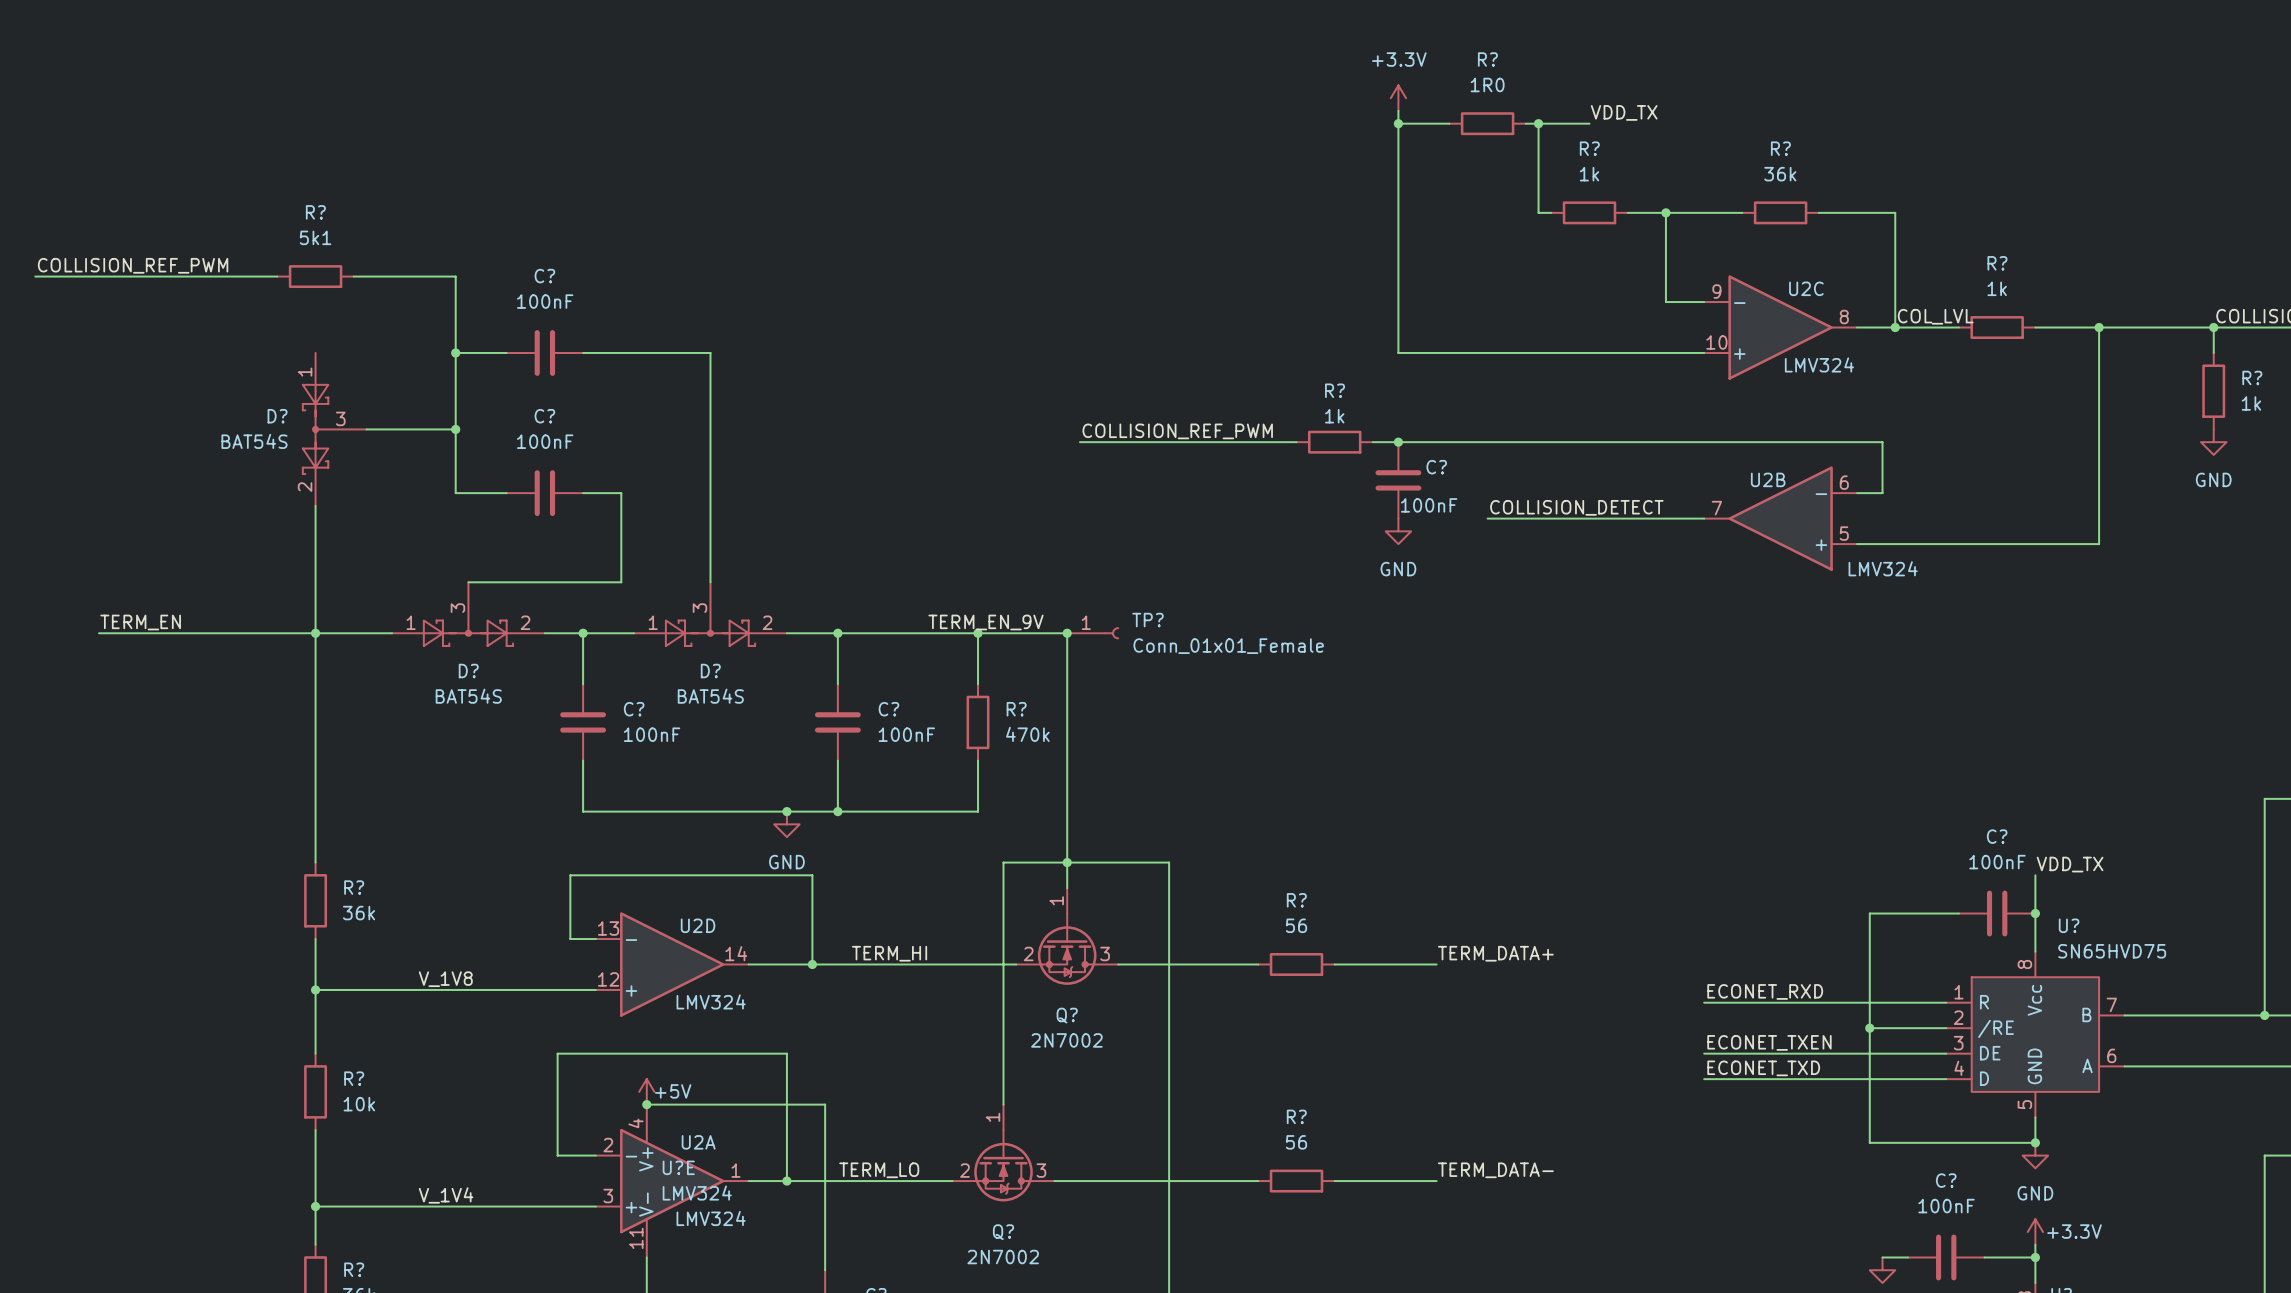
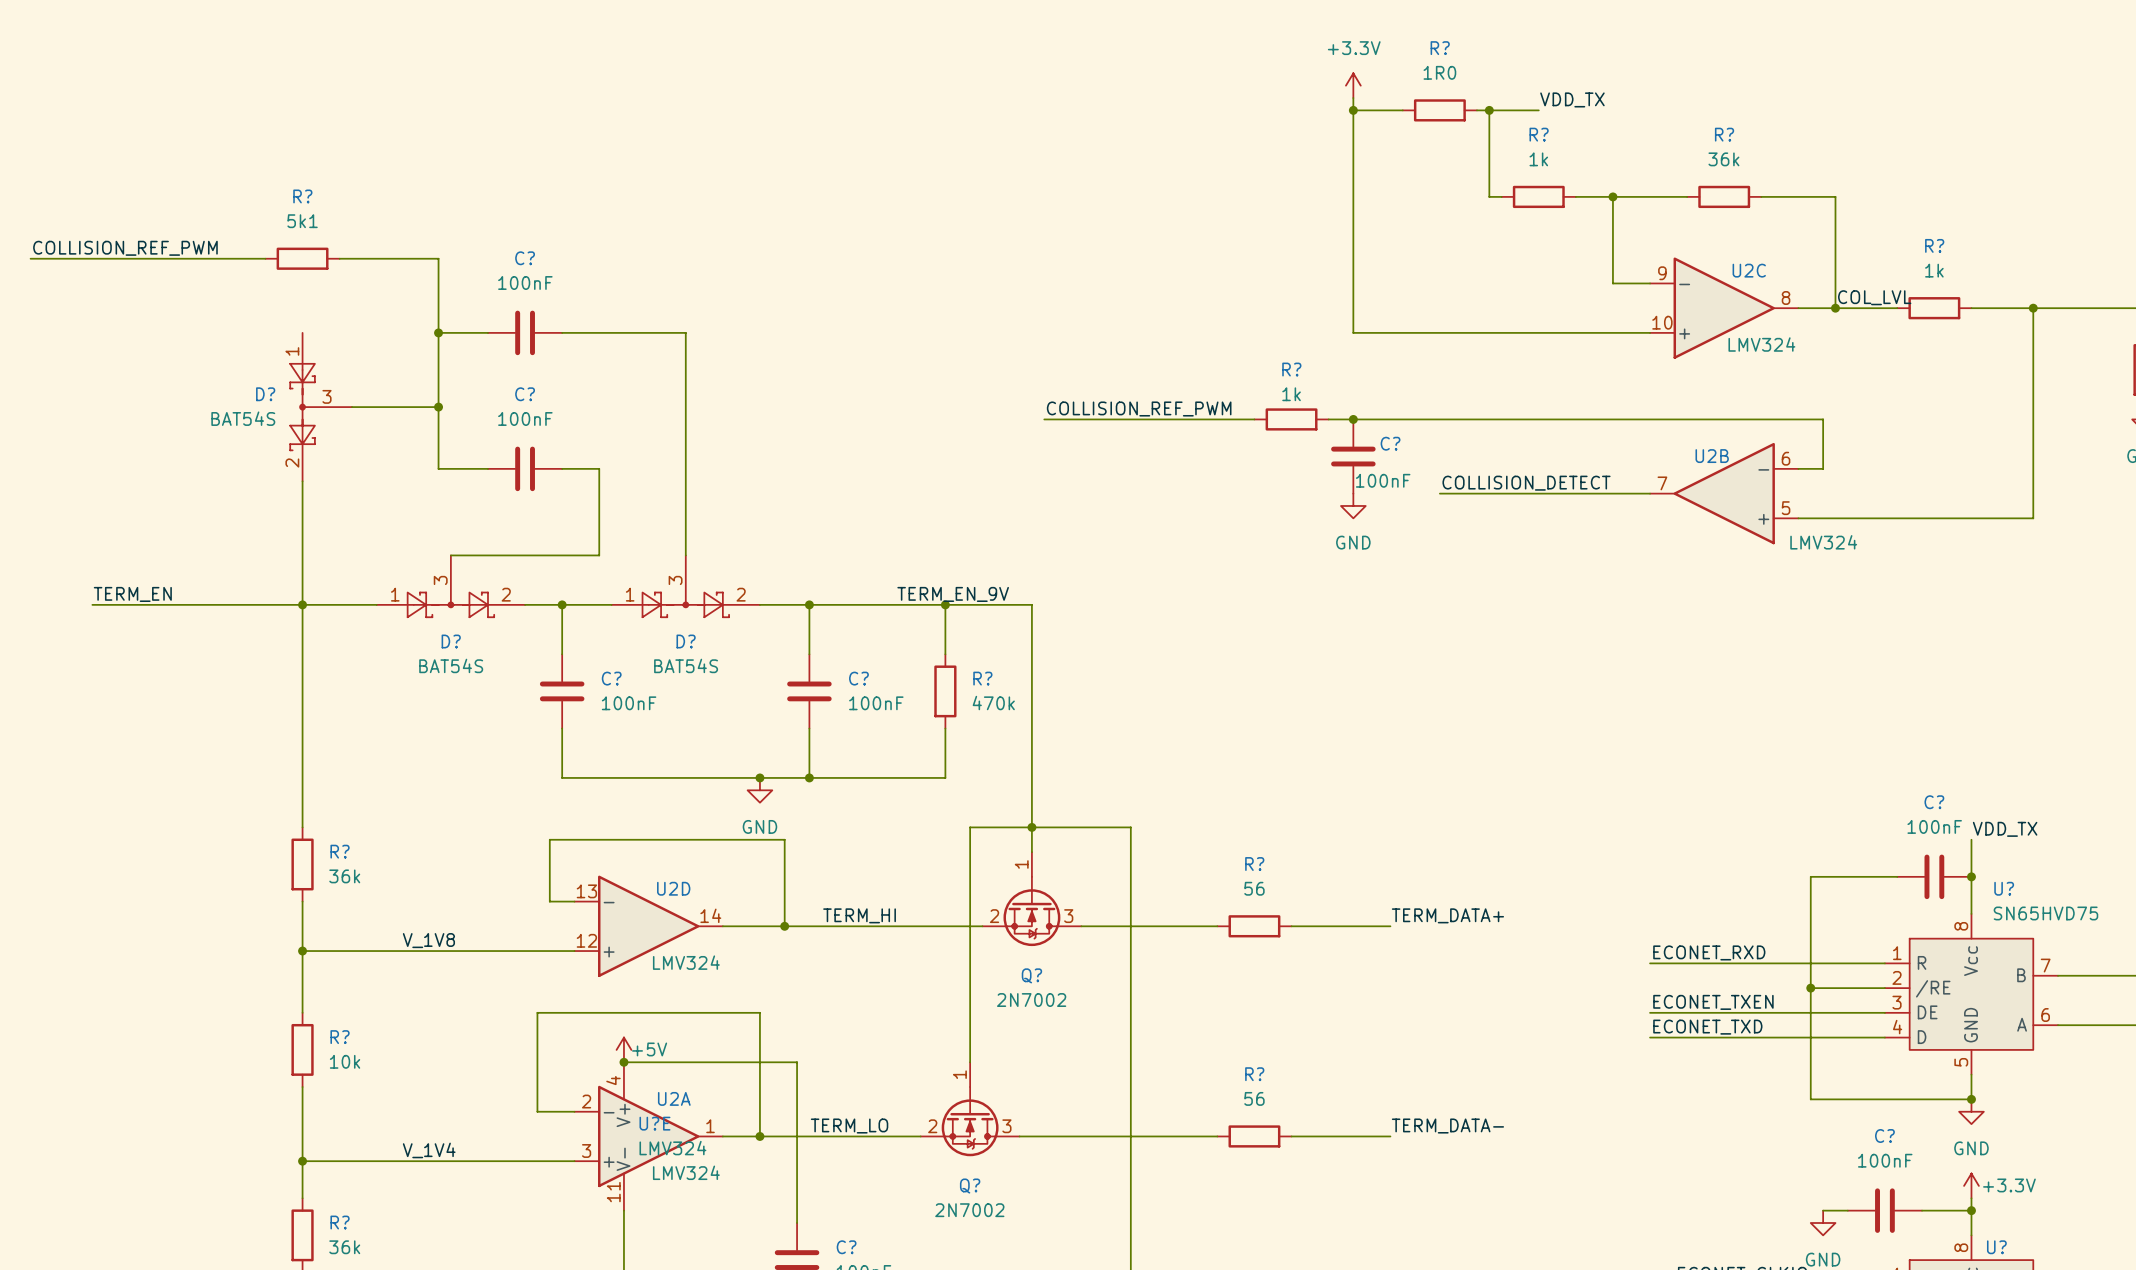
junction: (1067, 633) -> none
TP?: Conn_01x01_Female (1093, 633) -> none

